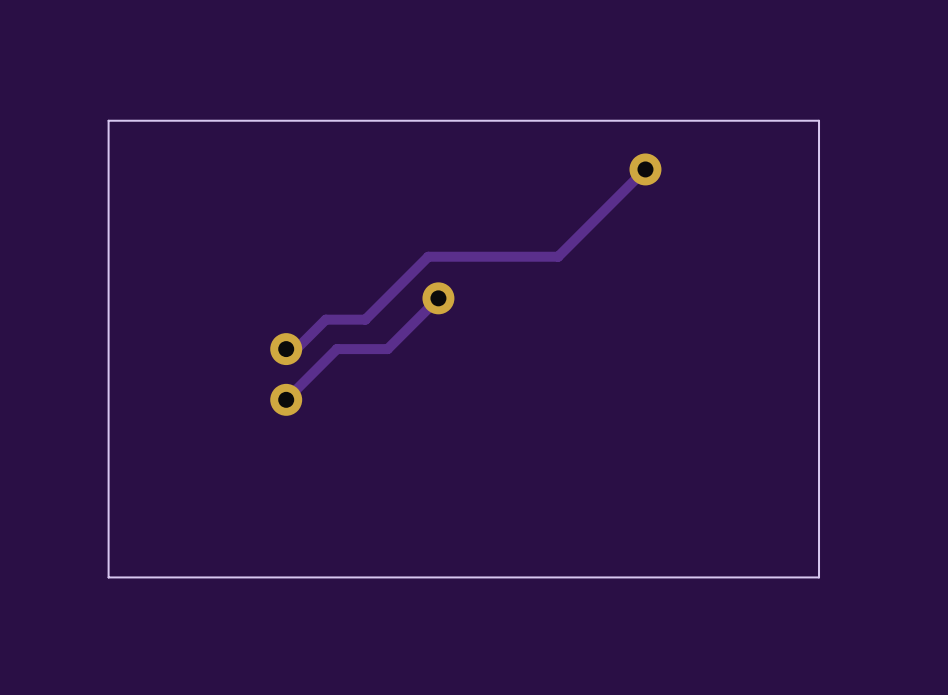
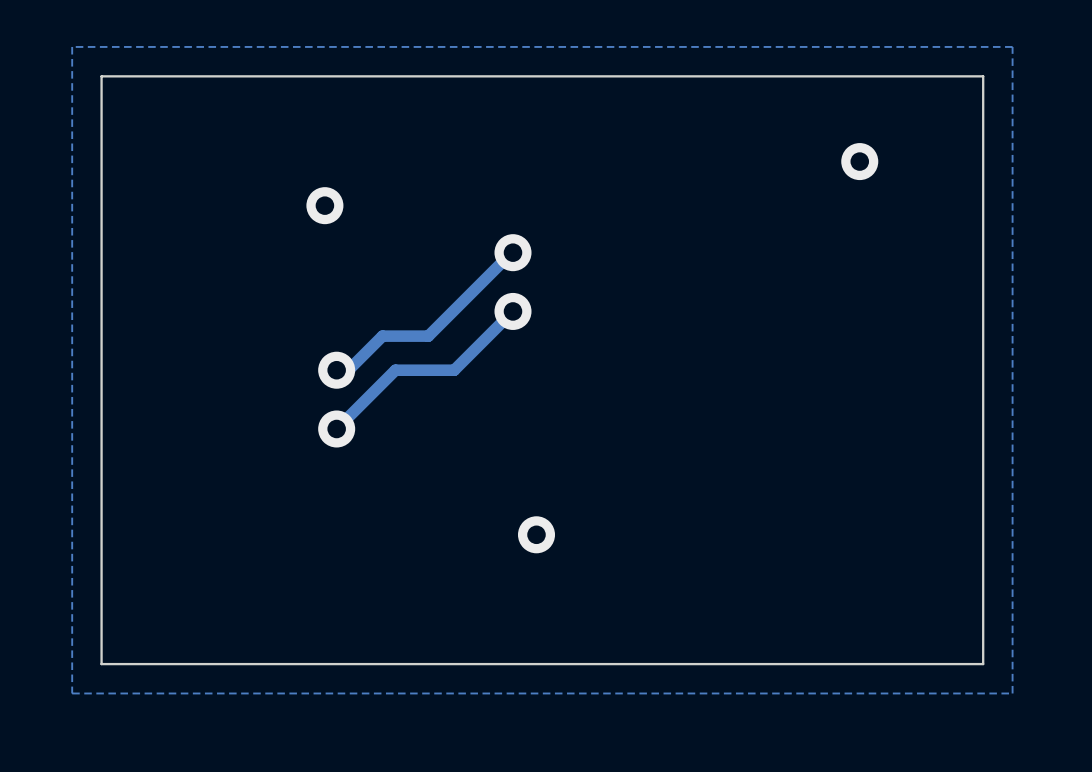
zone outline: none -> (1012, 46) (1012, 693) (72, 693) (72, 46) (1012, 46)
board edge: (819, 120) (819, 577) (108, 577) (108, 120) (819, 120) -> (983, 76) (983, 664) (101, 664) (101, 76) (983, 76)
track: (645, 169) (558, 256) (428, 256) -> none
via position: (645, 169) -> (859, 161)
via: none -> (324, 205)
via: none -> (512, 252)
via: none -> (536, 534)

